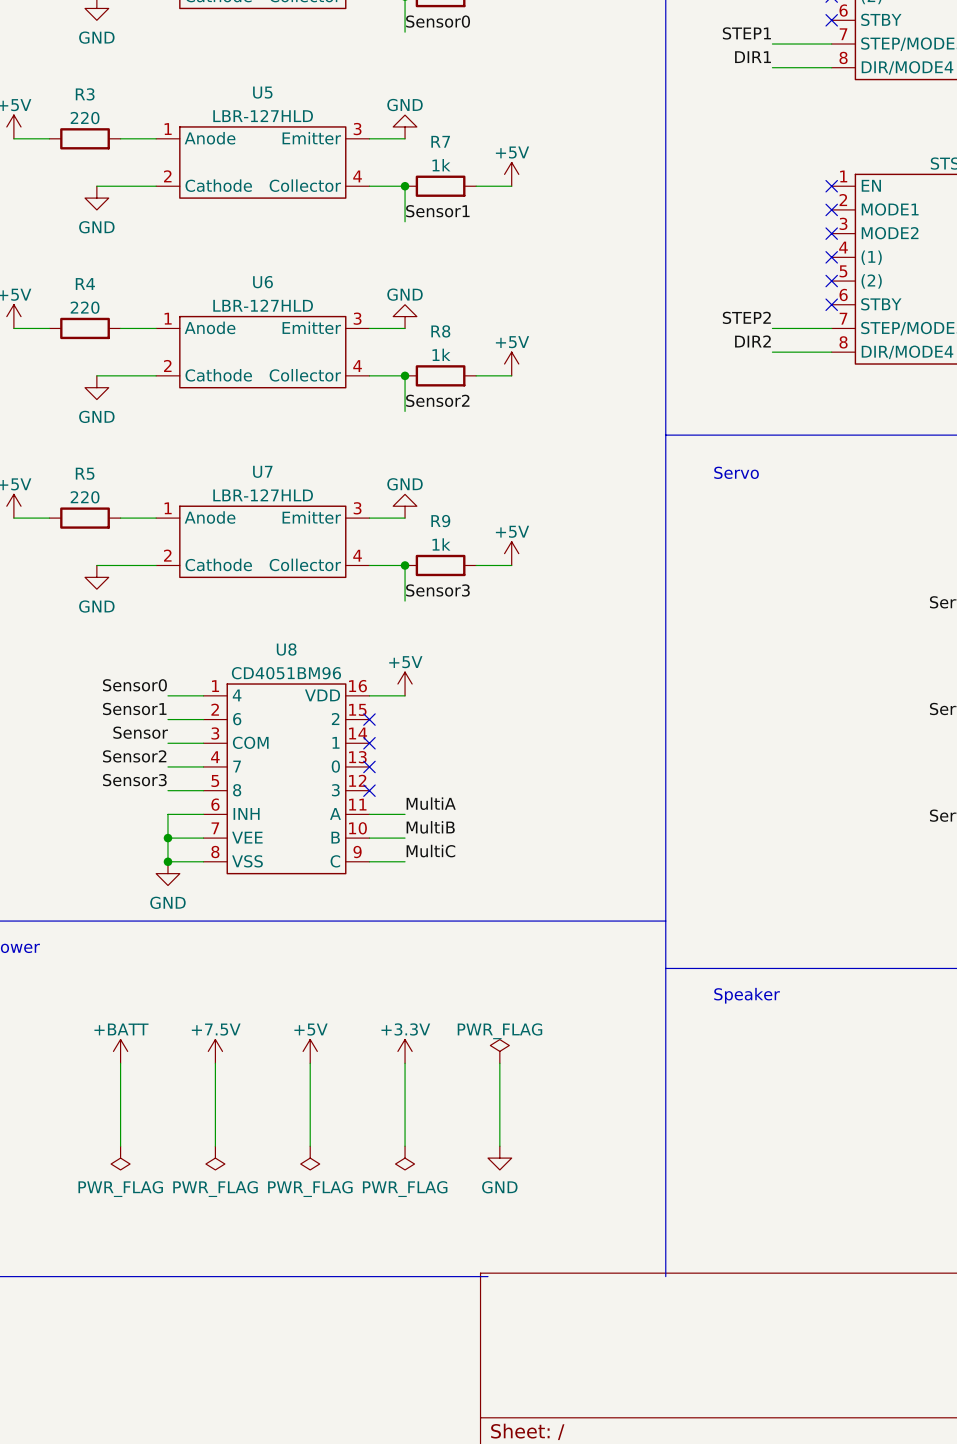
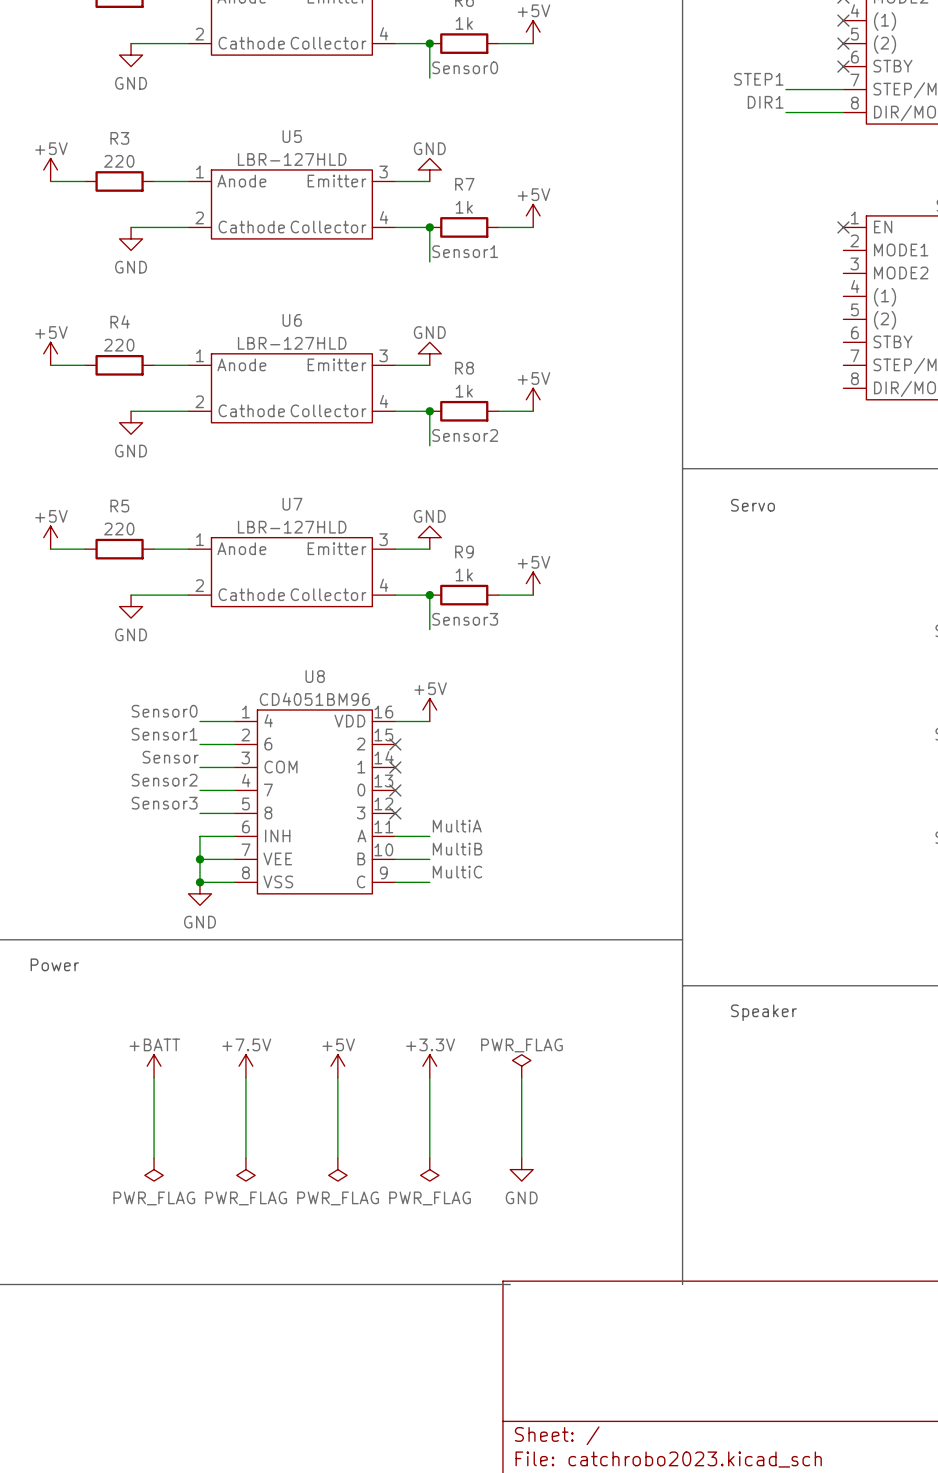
no-connect mark: (831, 209) -> none
no-connect mark: (831, 233) -> none
no-connect mark: (831, 257) -> none
no-connect mark: (831, 281) -> none
no-connect mark: (831, 304) -> none
label: STEP2 (746, 317) -> none
wire: (772, 328) (831, 328) -> none
label: DIR2 (752, 341) -> none
wire: (772, 352) (831, 352) -> none

